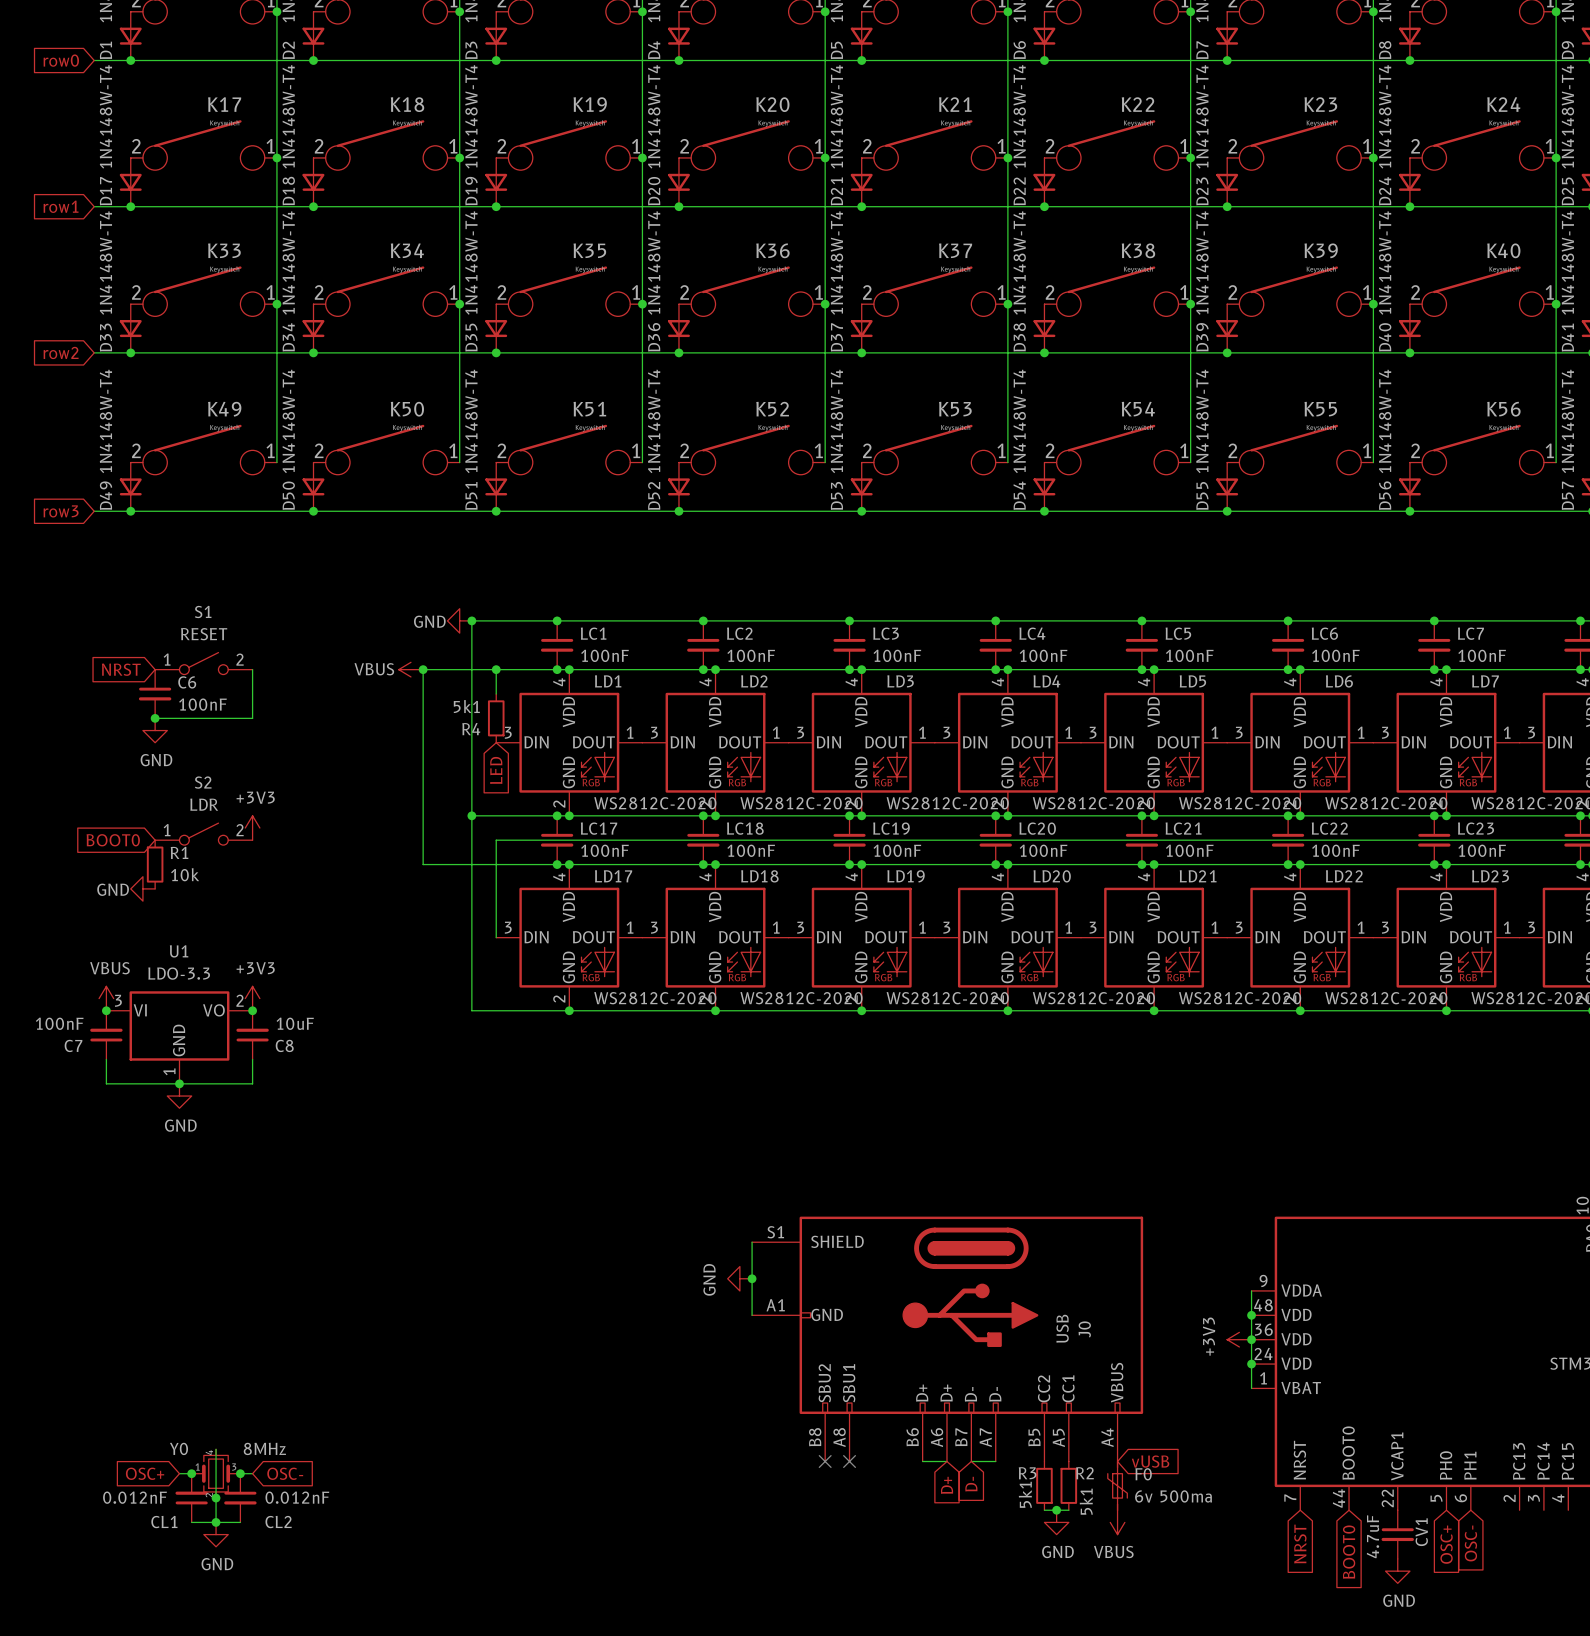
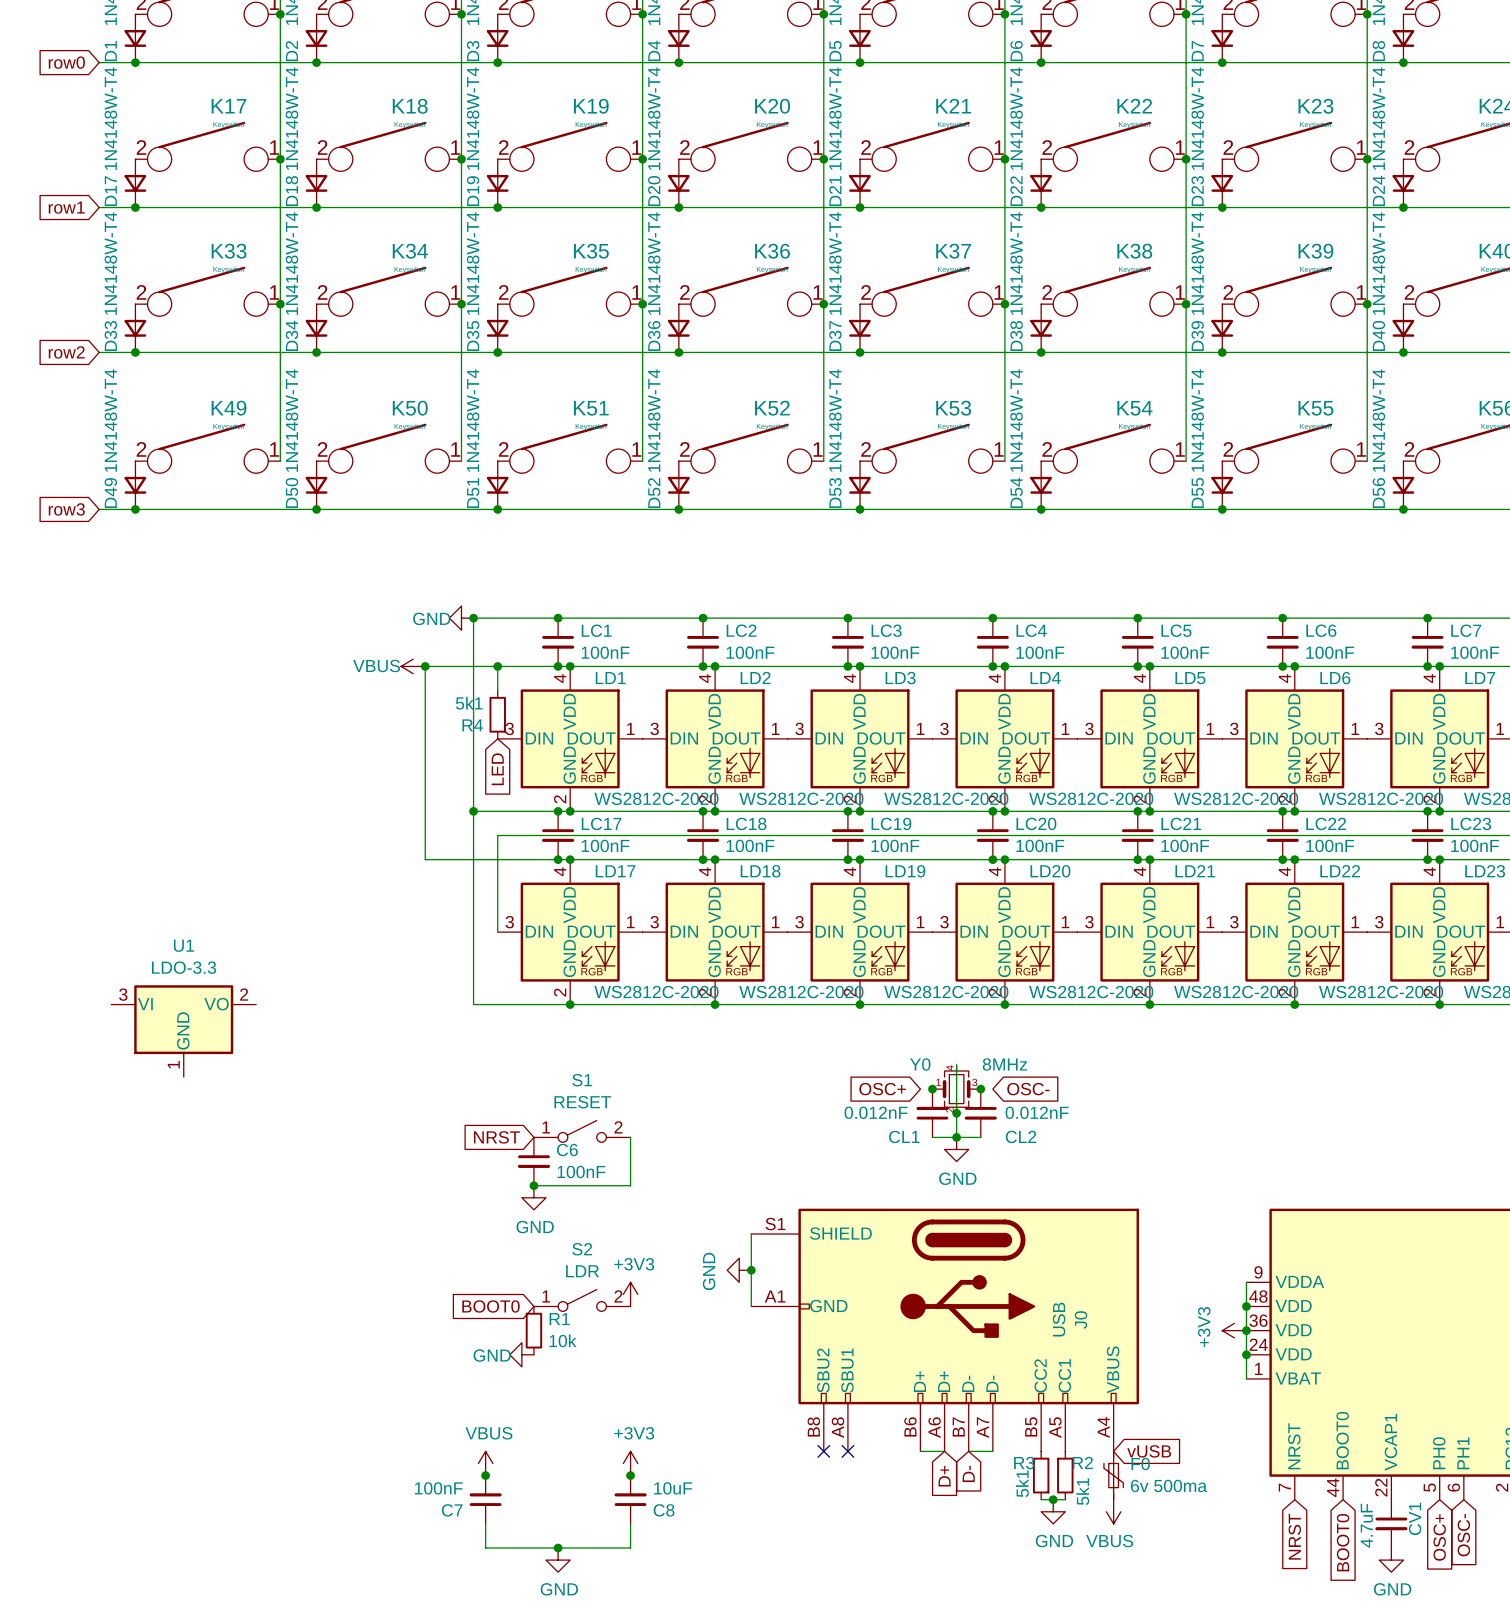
S1 position: (203, 663) -> (582, 1131)
global label: NRST (121, 669) -> none
wire: (252, 669) (252, 718) (155, 718) -> none
C6 position: (155, 694) -> (533, 1161)
junction: (155, 718) -> none
power symbol: GND (155, 730) -> none
power symbol: +3V3 (252, 828) -> none
S2 position: (203, 834) -> (582, 1300)
global label: BOOT0 (113, 840) -> none
R1 position: (155, 864) -> (533, 1330)
power symbol: GND (142, 888) -> none
power symbol: VBUS (106, 998) -> none
power symbol: +3V3 (252, 998) -> none
junction: (106, 1010) -> none
junction: (252, 1010) -> none
C7 position: (106, 1035) -> (485, 1499)
C8 position: (252, 1035) -> (630, 1499)
wire: (106, 1059) (106, 1083) (252, 1083) (252, 1059) -> none
wire: none -> (956, 1064) (956, 1137)
junction: (179, 1083) -> none
power symbol: GND (179, 1096) -> none
global label: none -> OSC+ (882, 1089)
junction: none -> (932, 1089)
junction: none -> (980, 1089)
global label: none -> OSC- (1028, 1089)
junction: none -> (956, 1113)
global label: none -> NRST (496, 1137)
wire: none -> (630, 1137) (630, 1185) (533, 1185)
wire: none -> (932, 1137) (980, 1137)
junction: none -> (956, 1137)
power symbol: none -> GND (956, 1149)
junction: none -> (533, 1185)
power symbol: none -> GND (533, 1197)
power symbol: none -> +3V3 (630, 1294)
global label: none -> BOOT0 (490, 1306)
power symbol: none -> GND (521, 1354)
wire: (216, 1449) (216, 1522) -> none
global label: OSC+ (145, 1473) -> none
wire: (179, 1473) (191, 1473) -> none
junction: (191, 1473) -> none
Y0 position: (216, 1473) -> (956, 1089)
wire: (240, 1473) (252, 1473) -> none
junction: (240, 1473) -> none
global label: OSC- (285, 1473) -> none
power symbol: none -> VBUS (485, 1463)
power symbol: none -> +3V3 (630, 1463)
junction: none -> (485, 1475)
junction: none -> (630, 1475)
CL1 position: (191, 1498) -> (932, 1113)
junction: (216, 1498) -> none
CL2 position: (240, 1498) -> (980, 1113)
wire: (191, 1522) (240, 1522) -> none
junction: (216, 1522) -> none
power symbol: GND (216, 1534) -> none
wire: none -> (485, 1523) (485, 1548) (630, 1548) (630, 1523)
junction: none -> (558, 1548)
power symbol: none -> GND (558, 1560)

